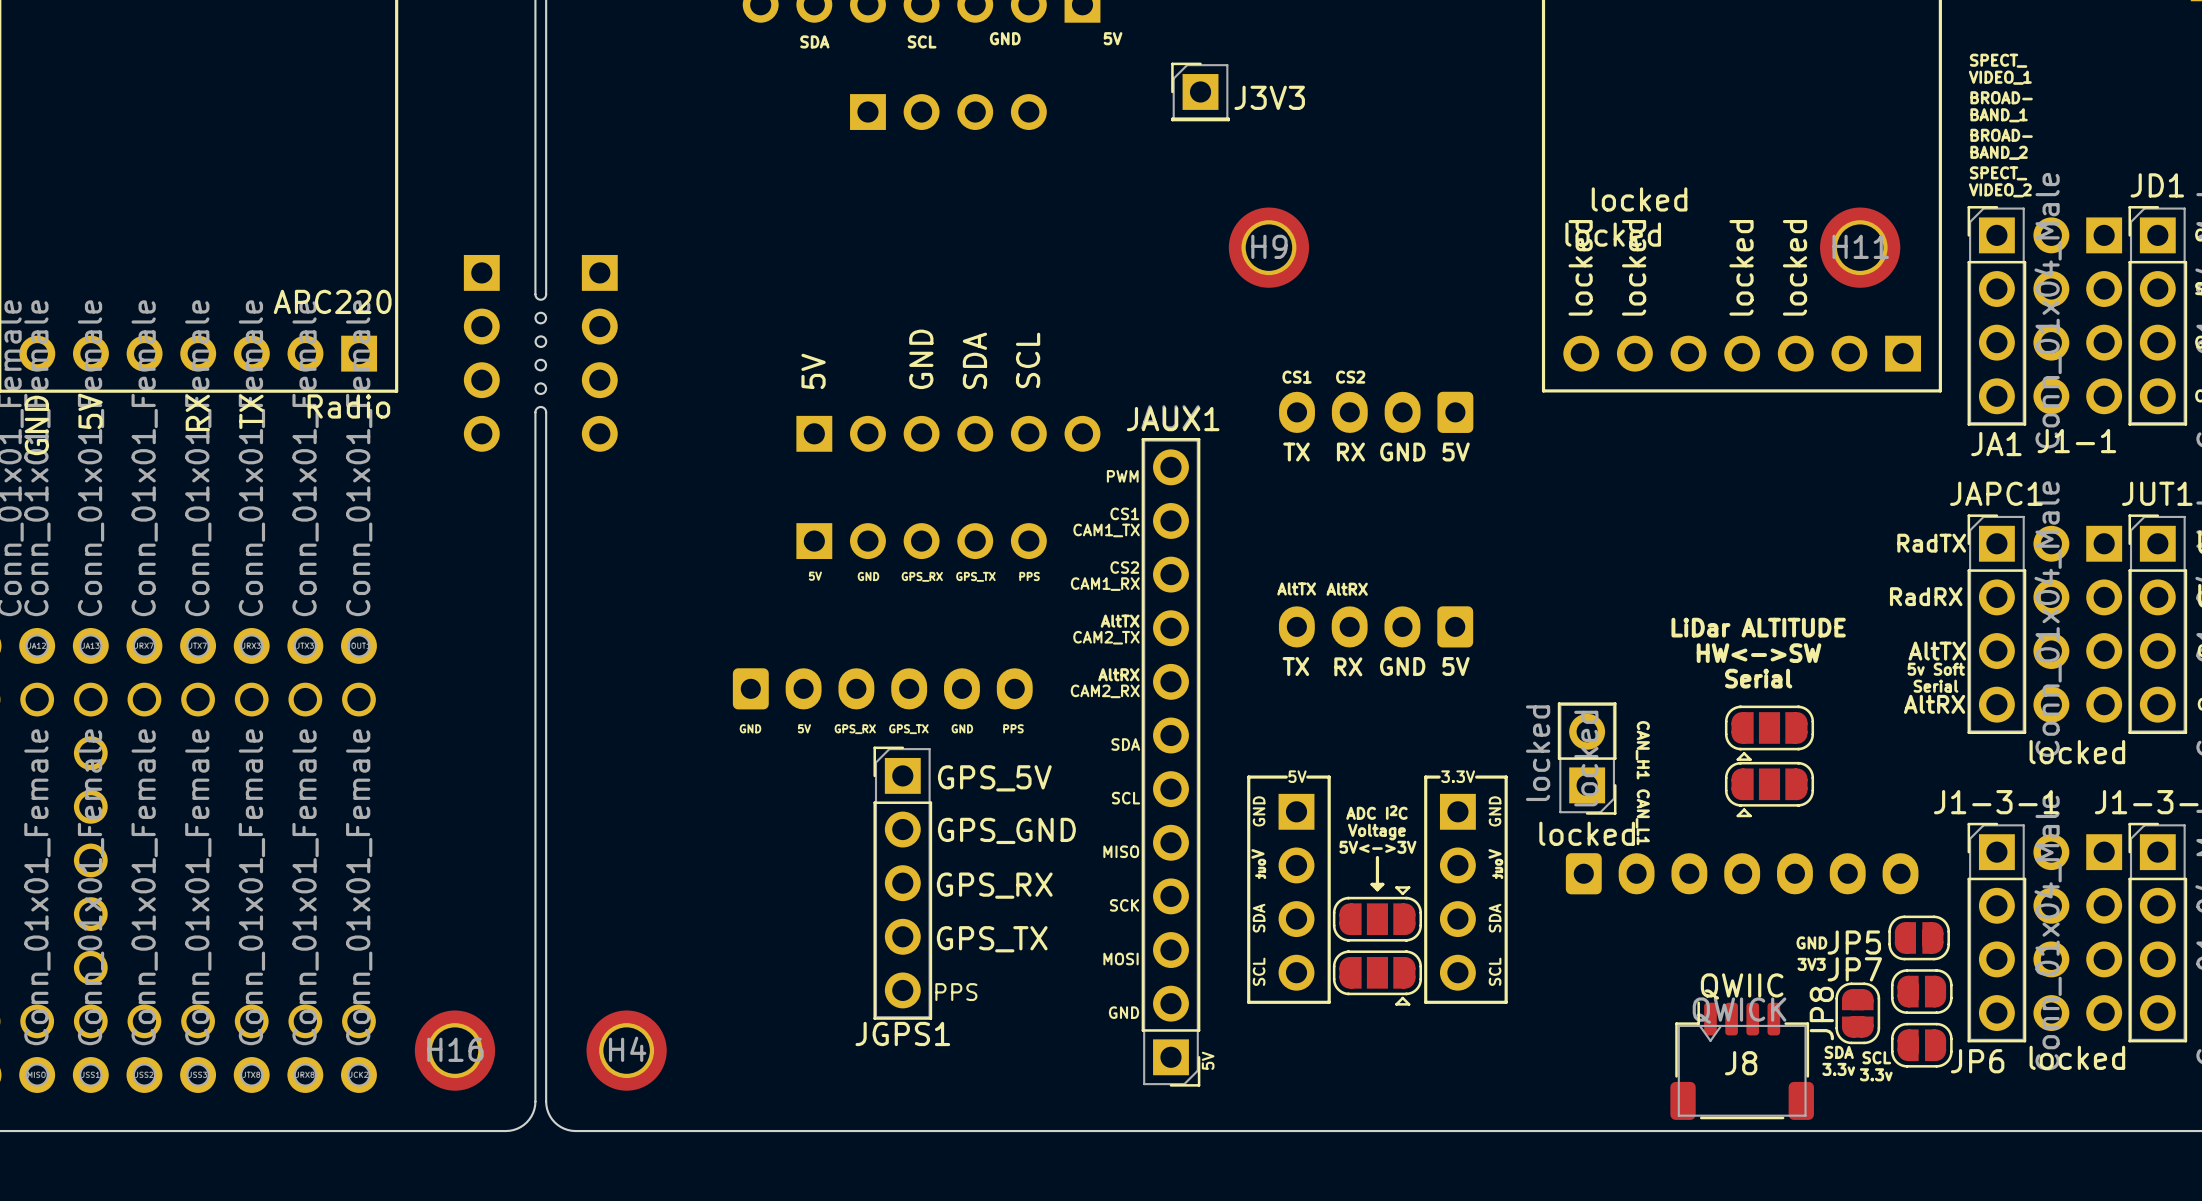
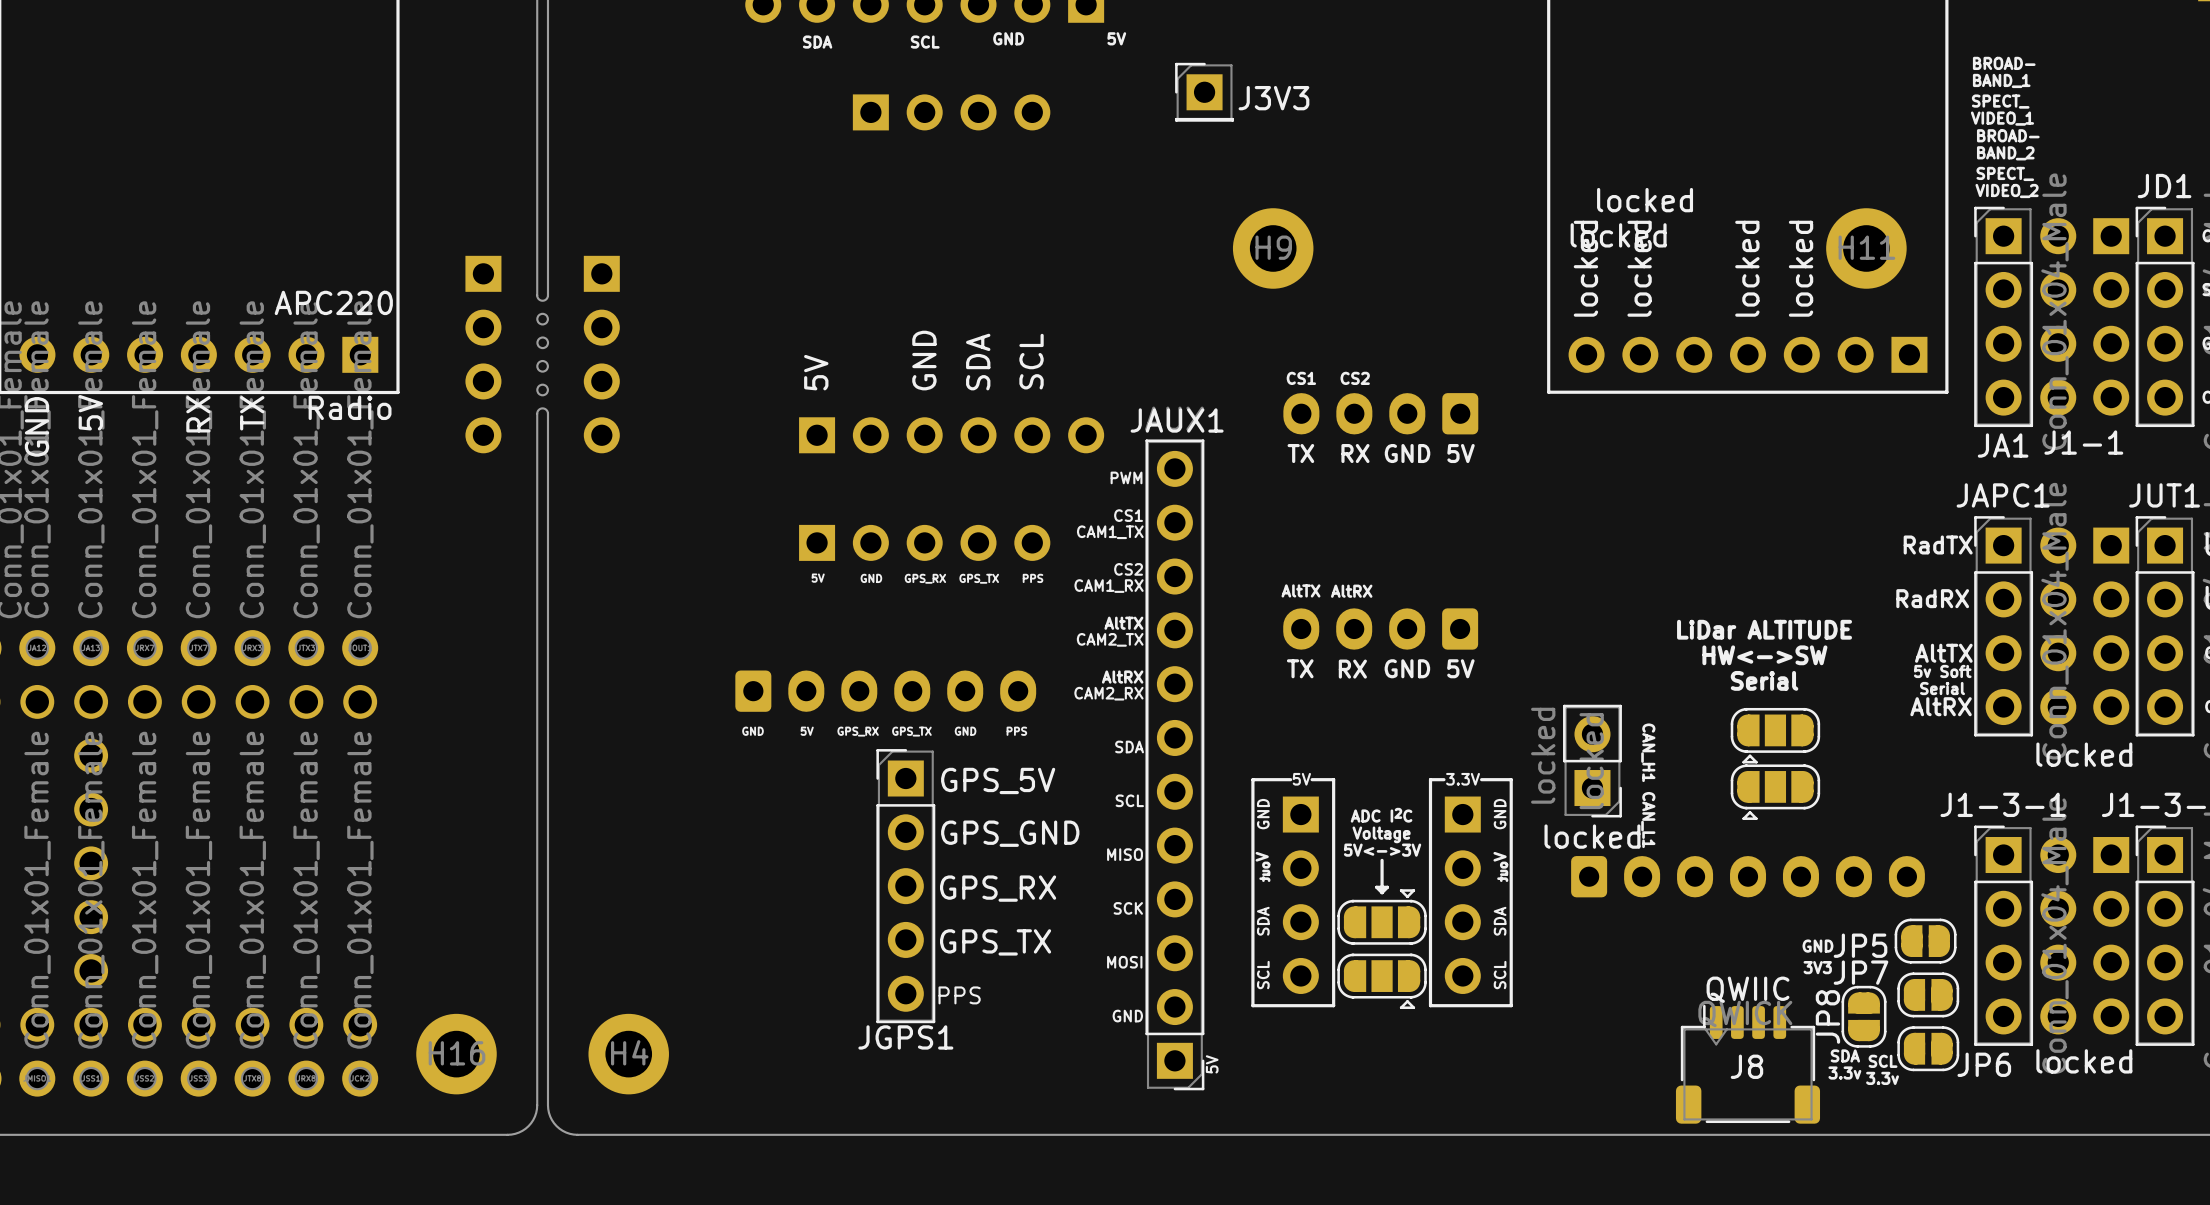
text: SPECT_ (1998, 60) -> BROAD- (2004, 63)
text: VIDEO_1 (2000, 77) -> BAND_1 (2001, 80)
text: BROAD- (2001, 97) -> SPECT_ (2000, 101)
text: BAND_1 (1999, 115) -> VIDEO_1 (2002, 118)

